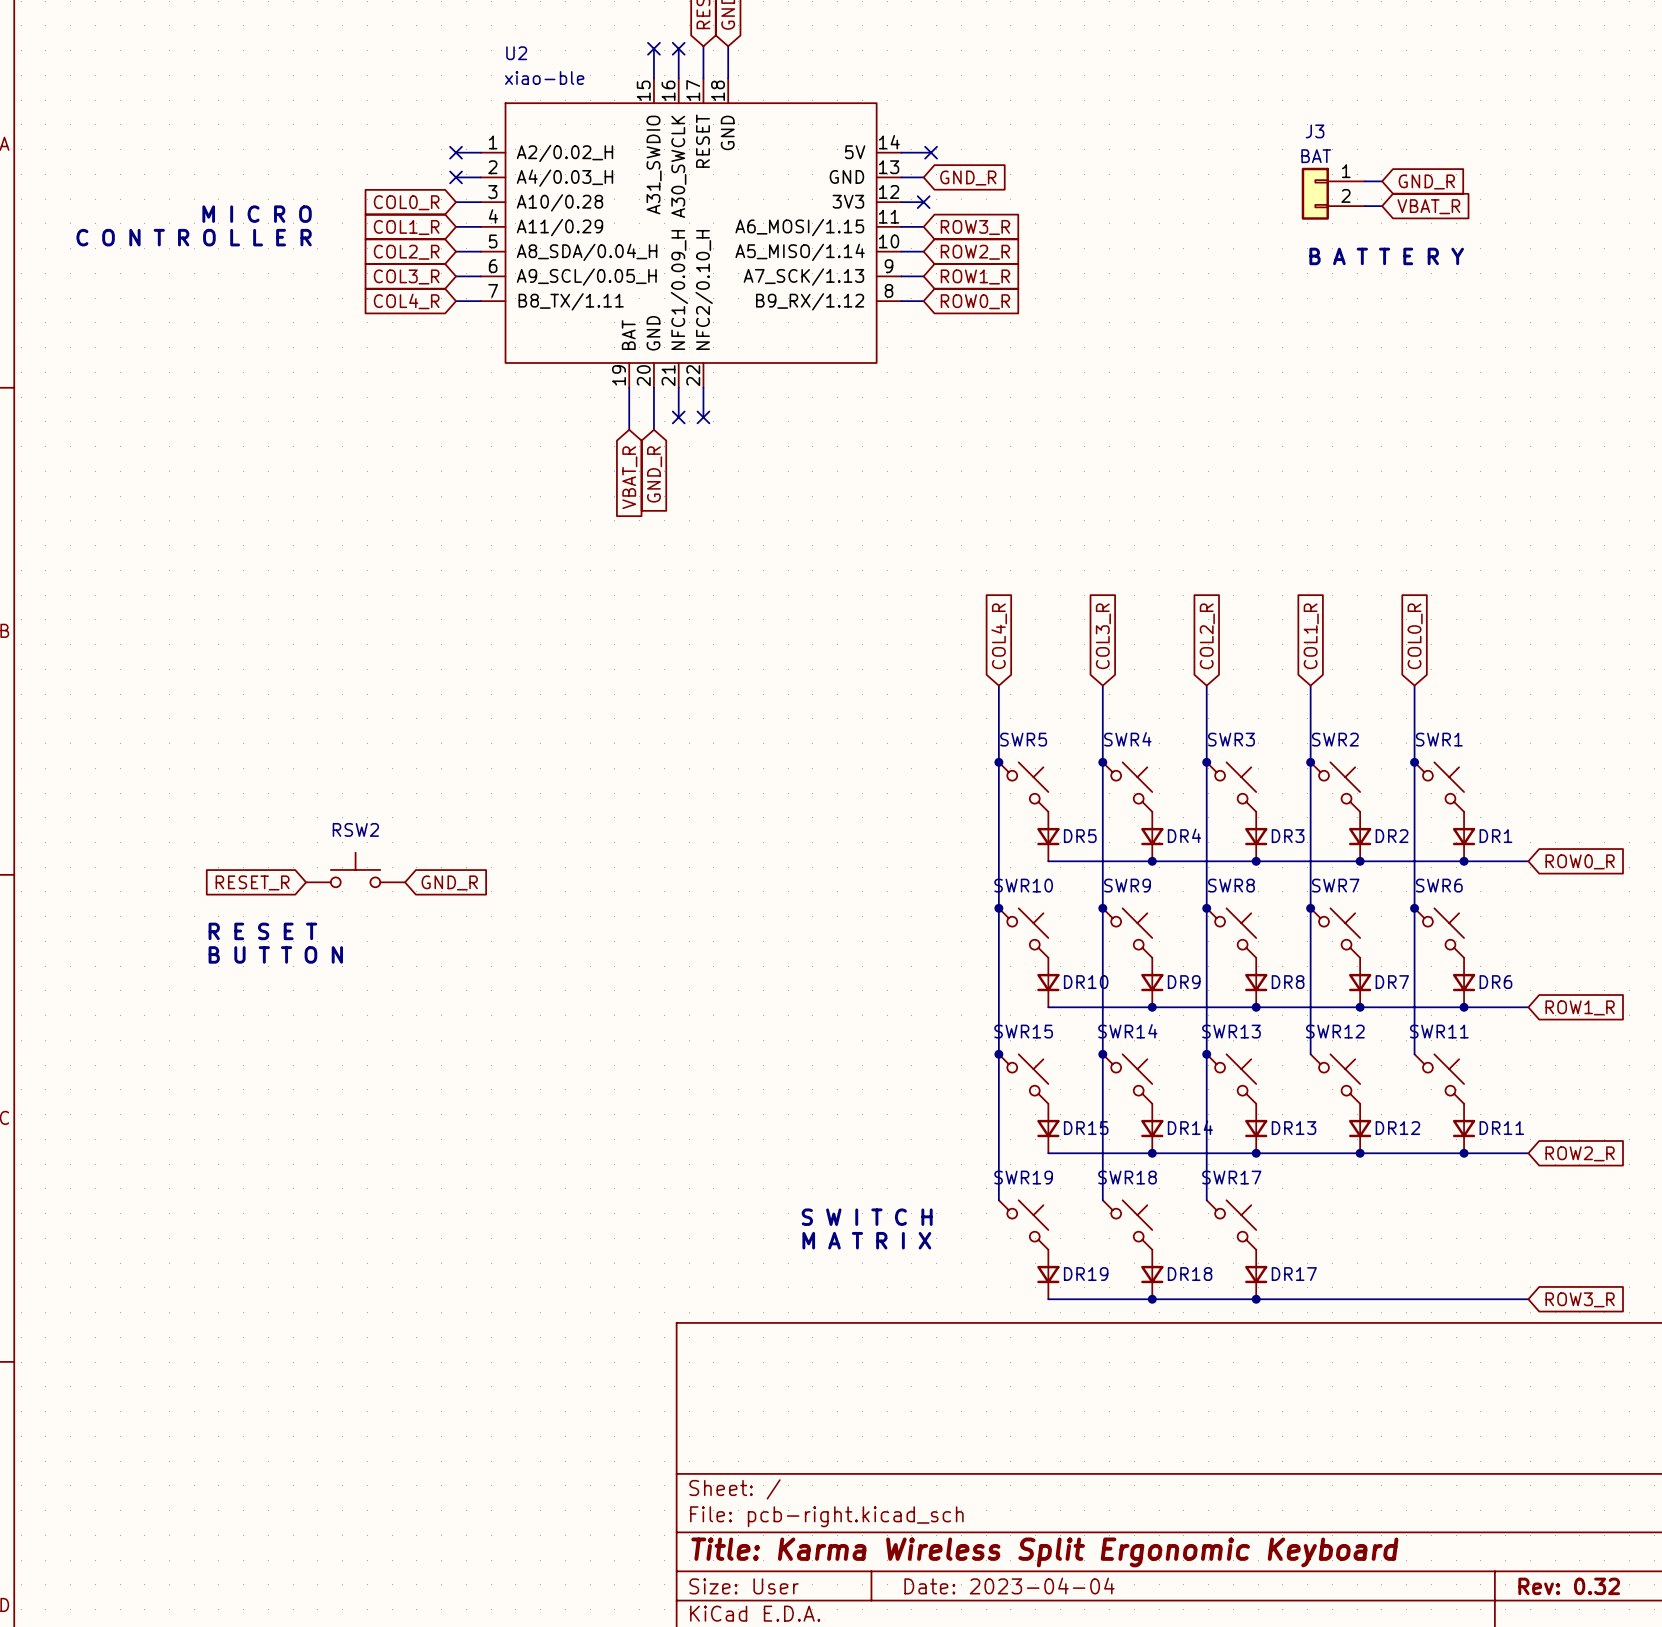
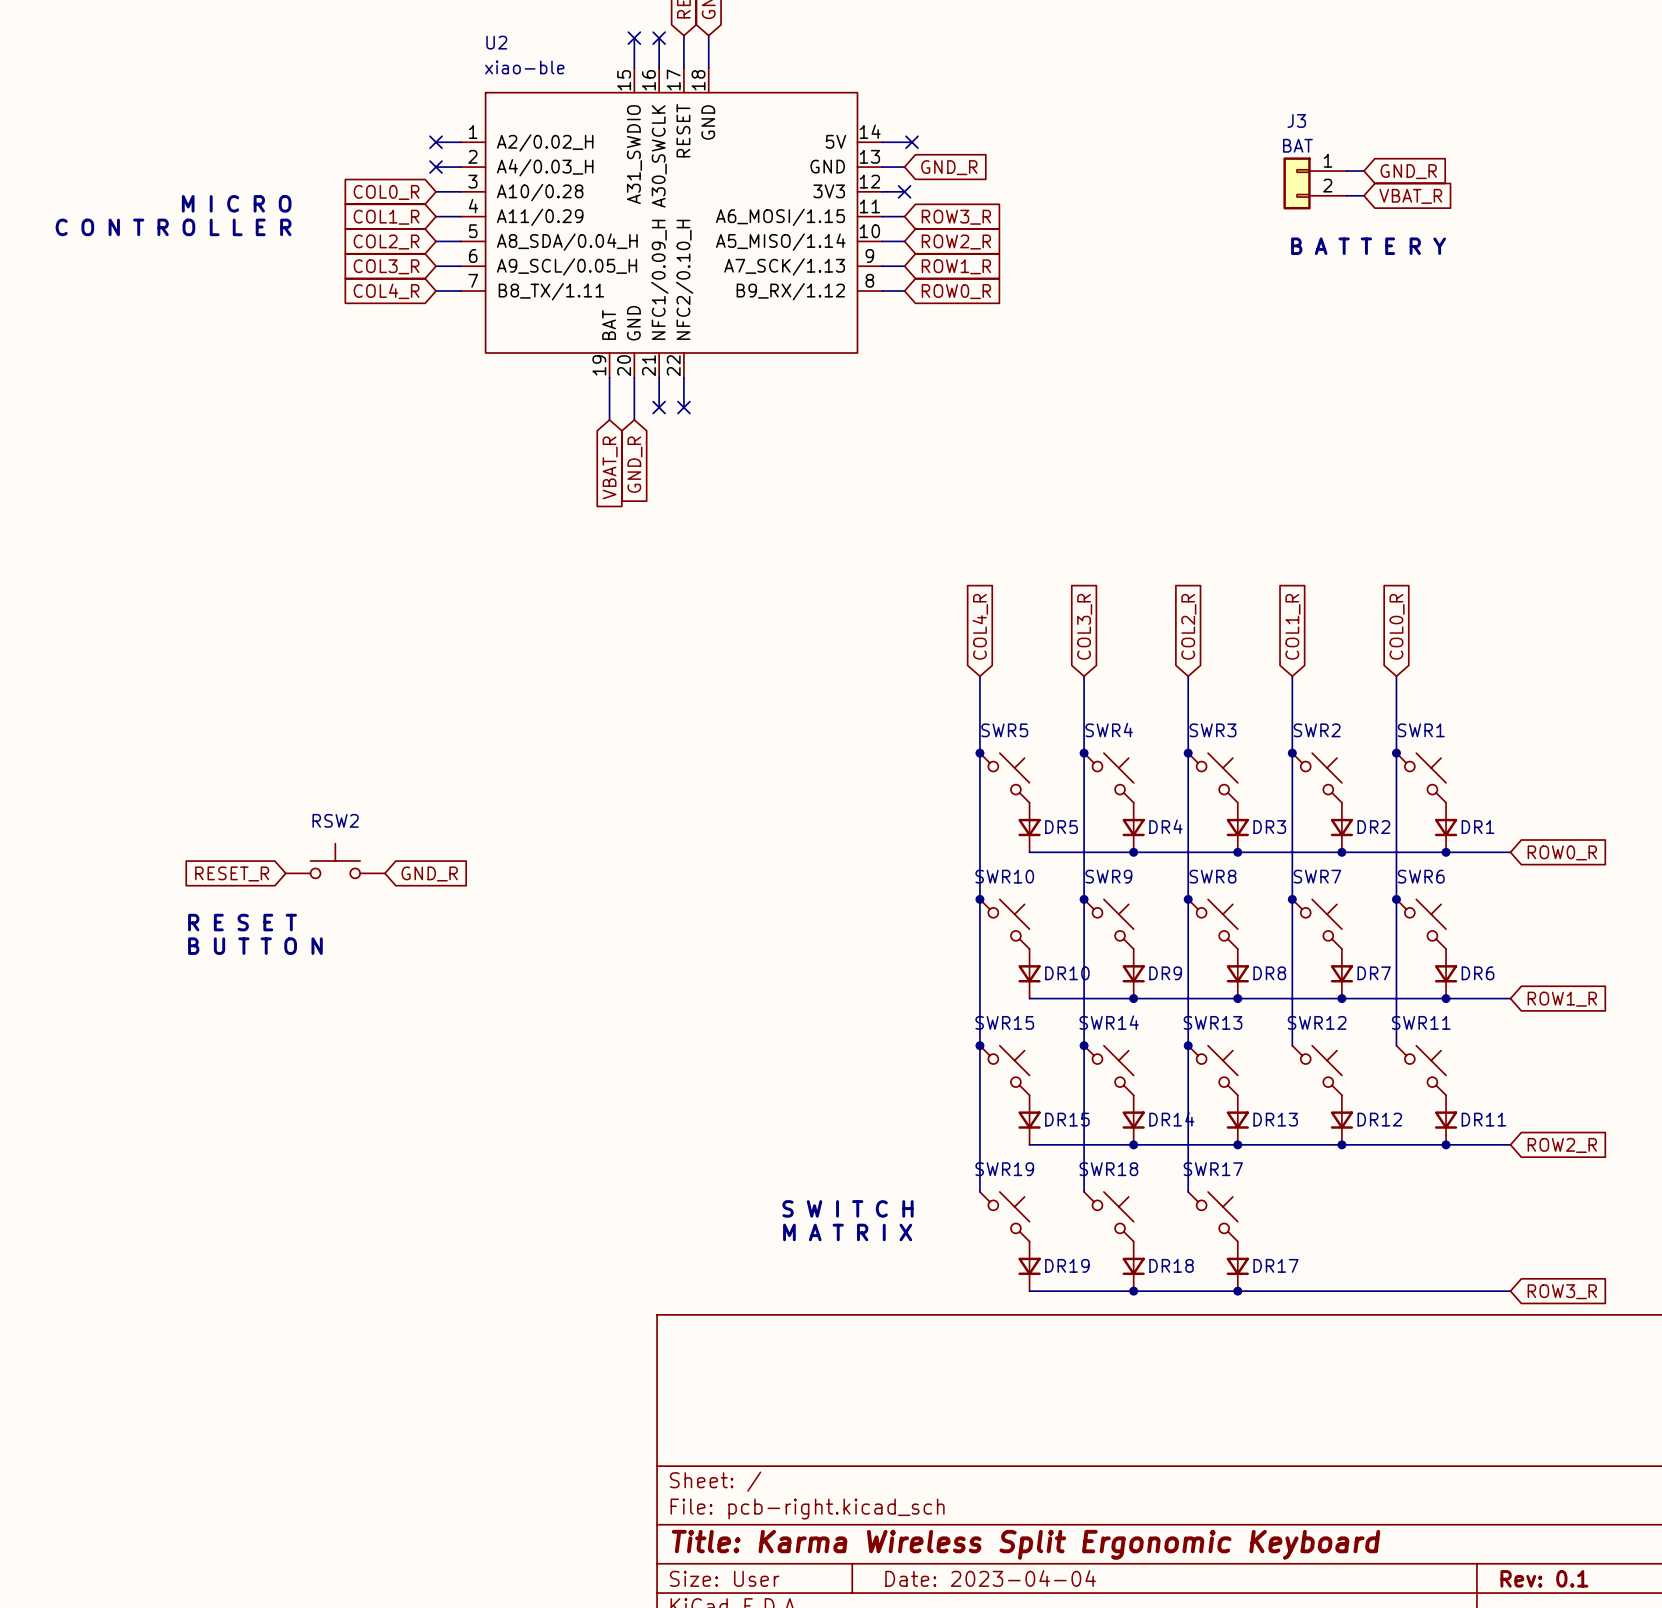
title block: Rev: 0.32 (1569, 1586) -> Rev: 0.1 (1544, 1578)

